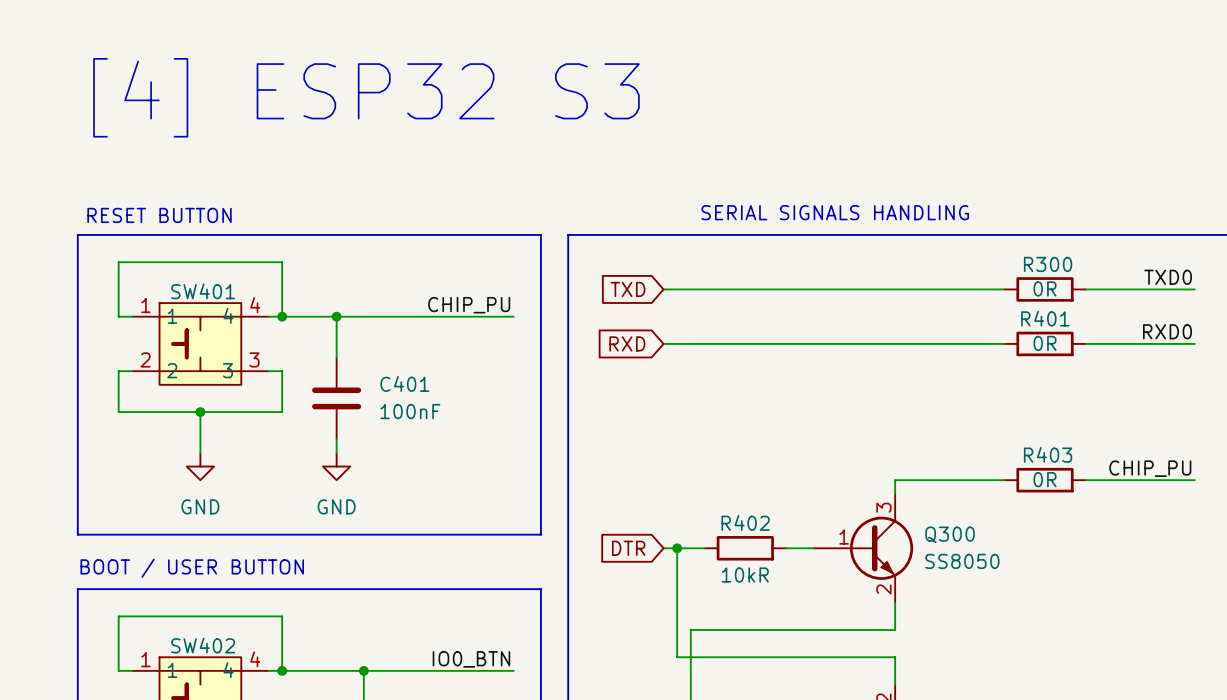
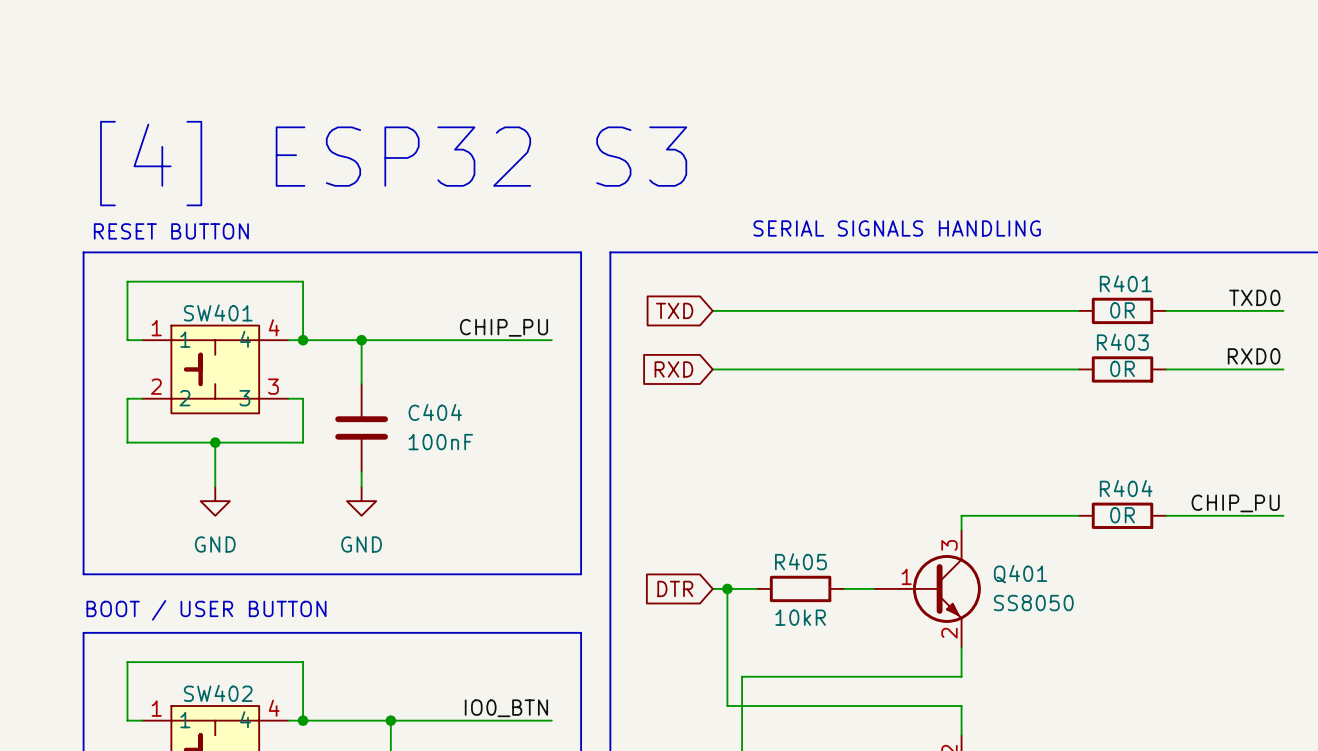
text position: [4] ESP32 S3 (366, 97) -> [4] ESP32 S3 (393, 163)
R300 name: R300 (1048, 264) -> R401 (1125, 283)
R401 name: R401 (1045, 318) -> R403 (1122, 342)
C401 name: C401 (404, 383) -> C404 (435, 412)
R403 name: R403 (1048, 454) -> R404 (1126, 488)
R402 name: R402 (745, 522) -> R405 (800, 561)
Q300 name: Q300 (950, 534) -> Q401 (1020, 574)

